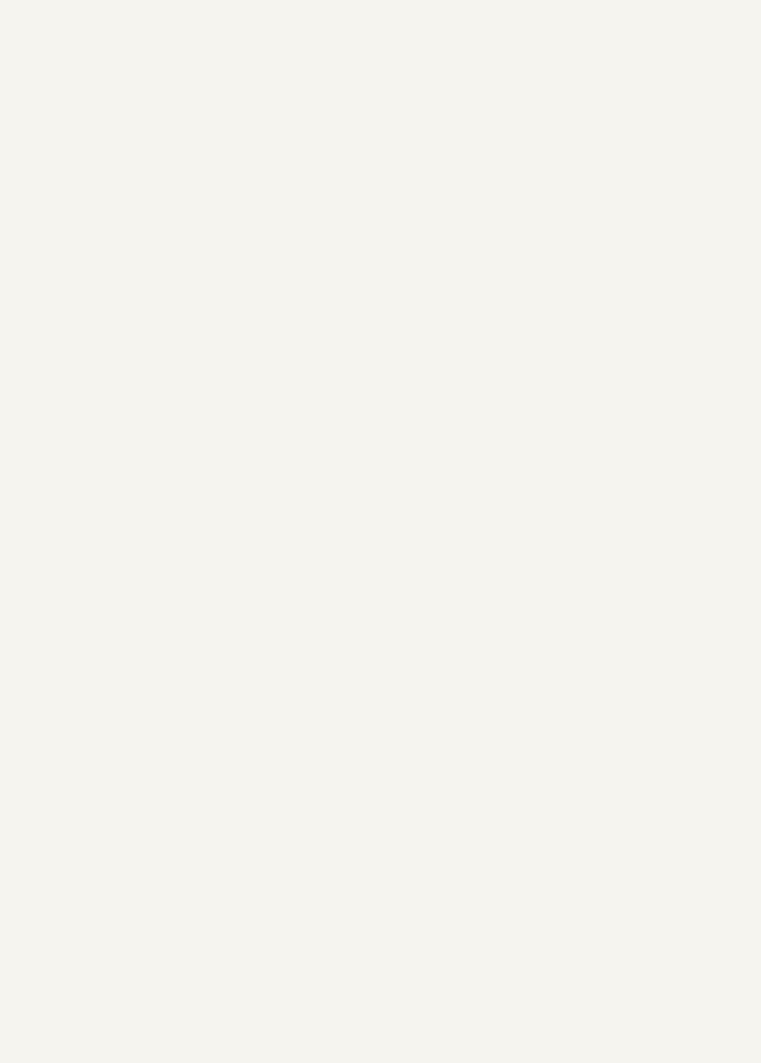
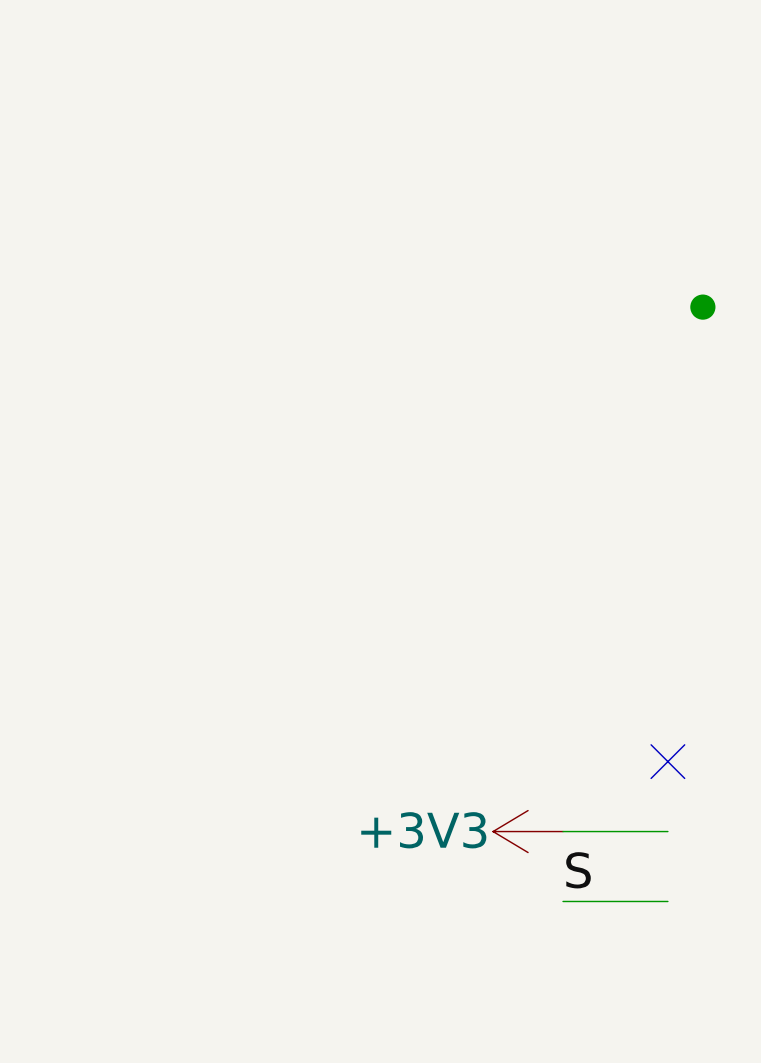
junction: none -> (702, 307)
no-connect mark: none -> (667, 761)
power symbol: none -> +3V3 (528, 831)
wire: none -> (563, 831) (667, 831)
label: none -> S (578, 870)
wire: none -> (563, 901) (667, 901)

